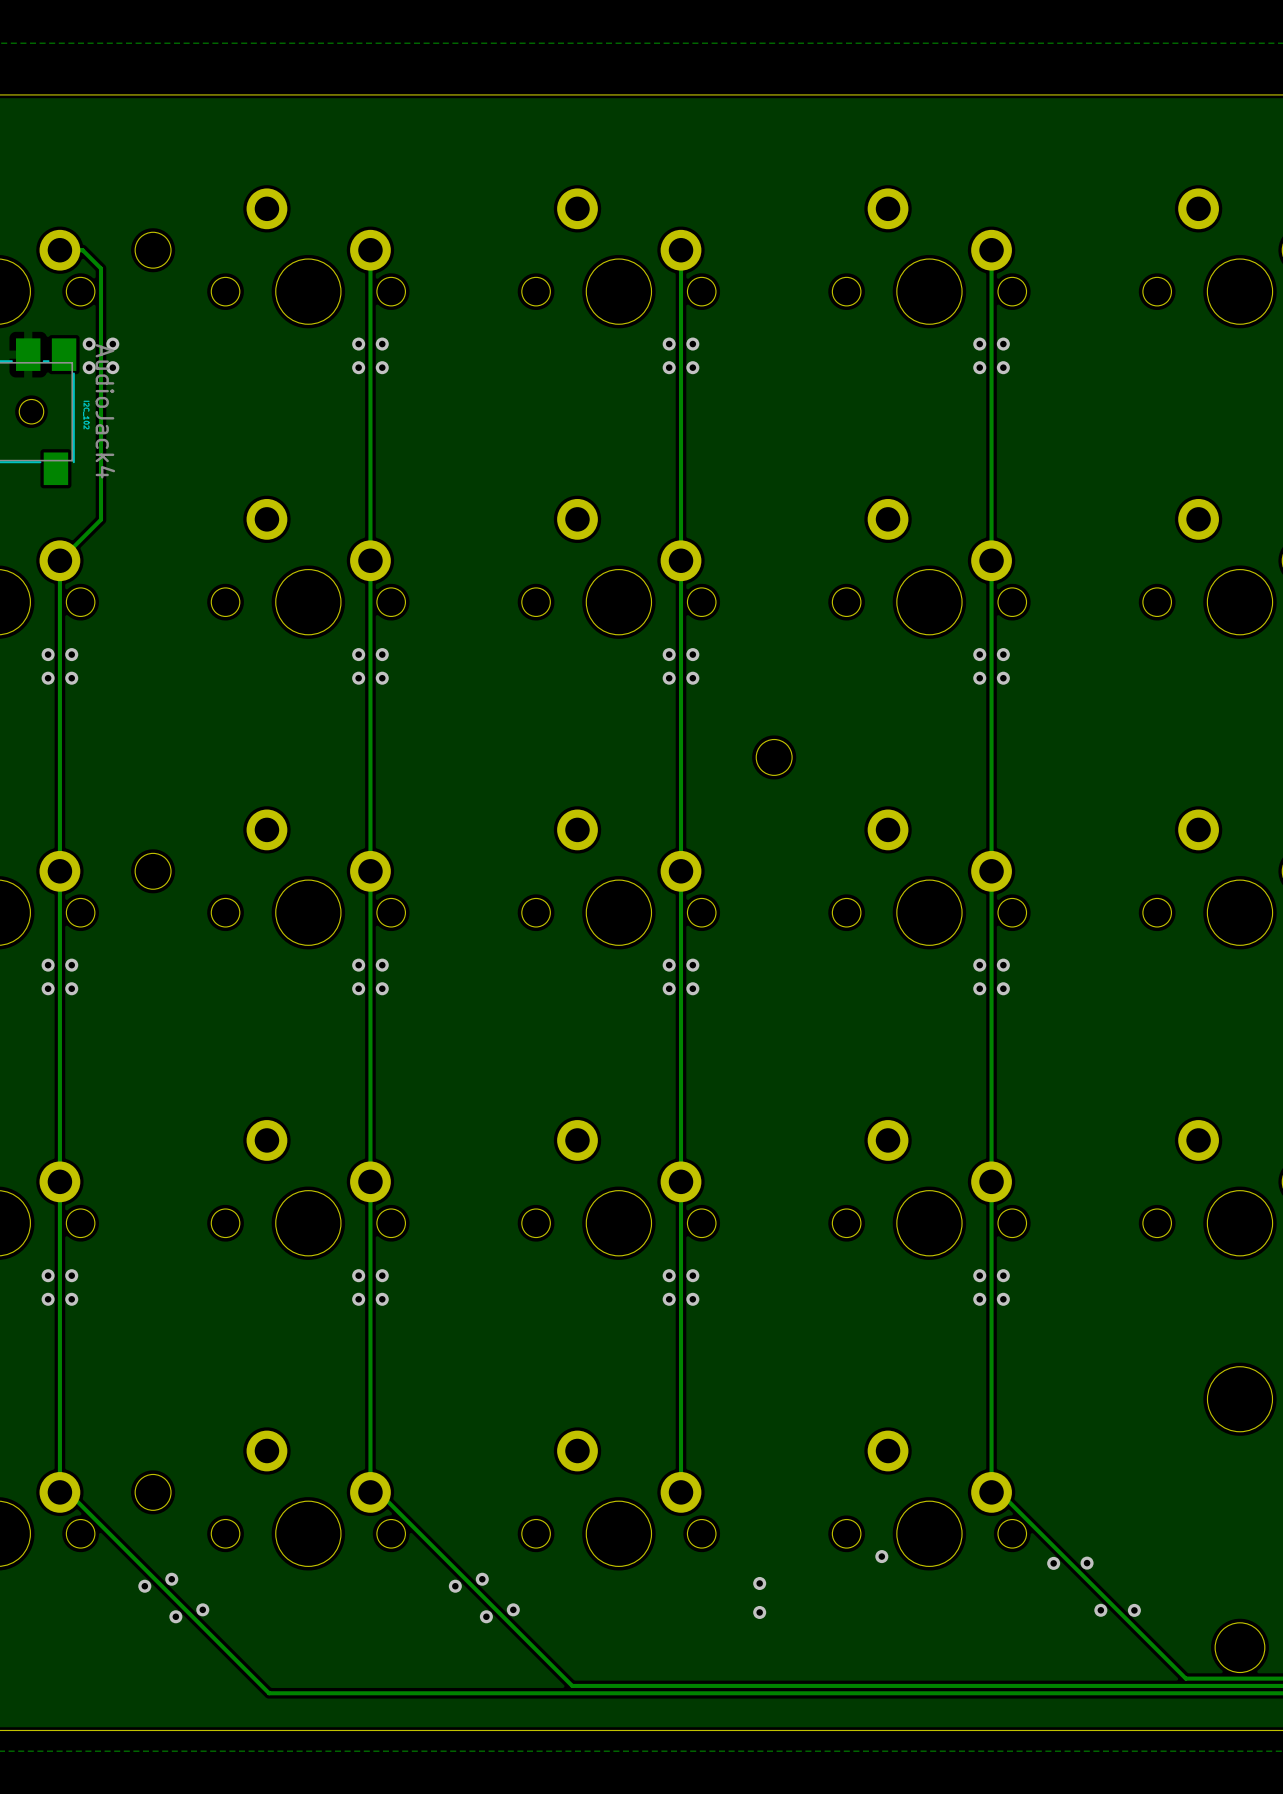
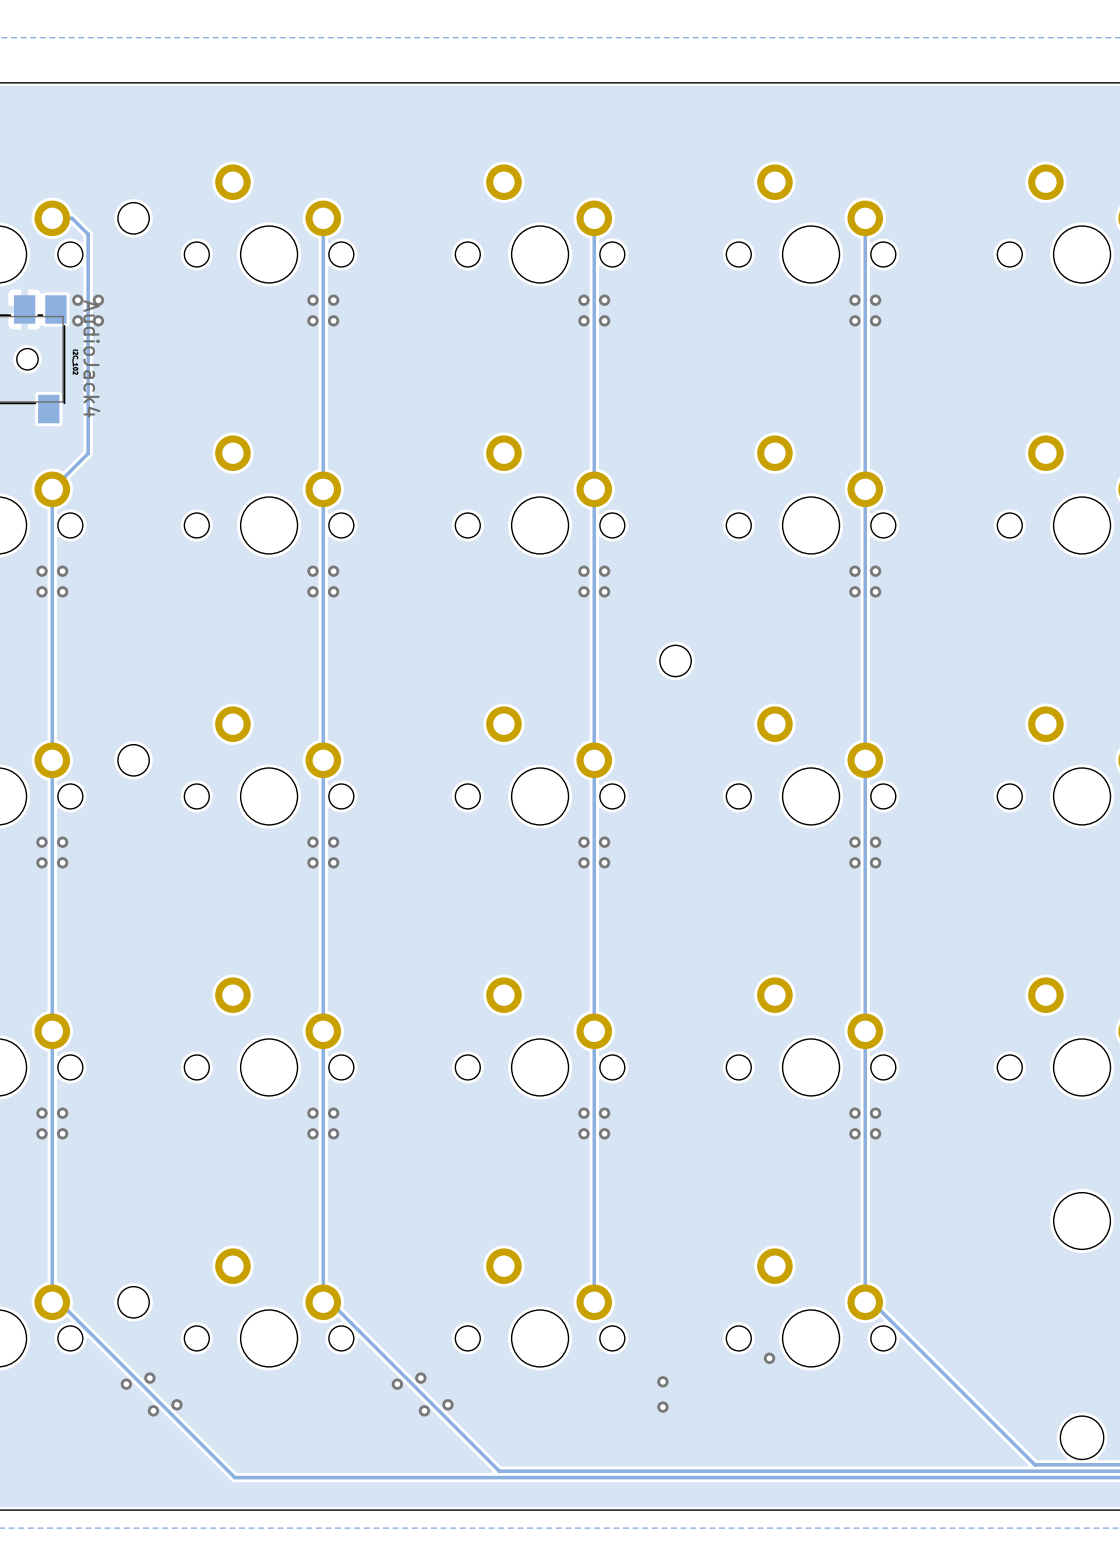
via: (1053, 1563) -> none
via: (1087, 1563) -> none
via: (1100, 1610) -> none
via: (1134, 1610) -> none

